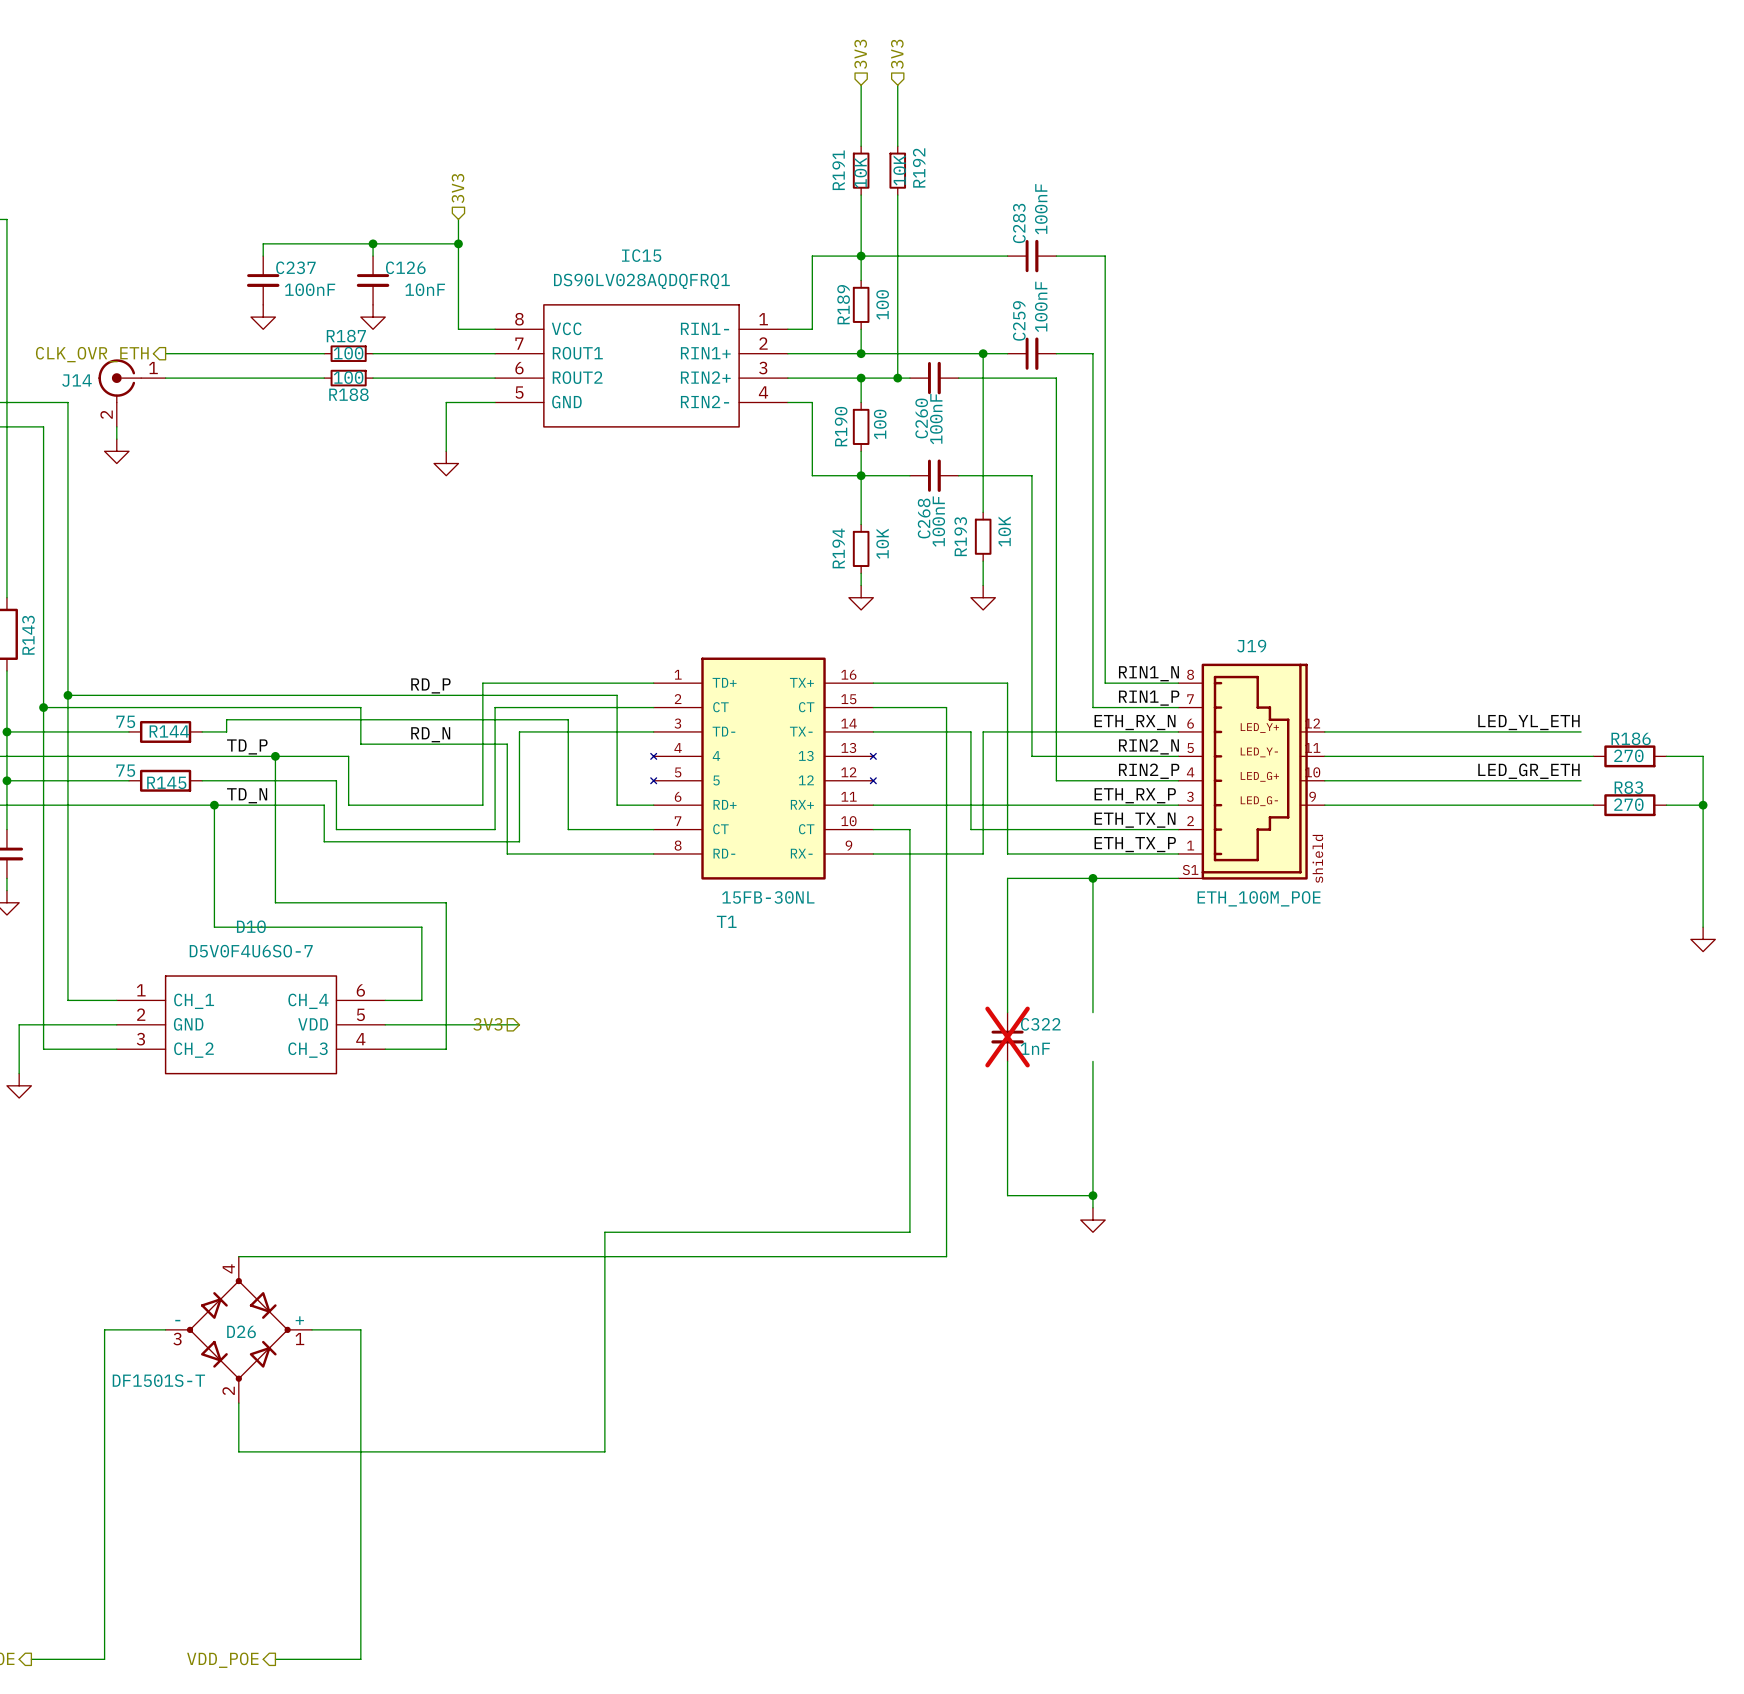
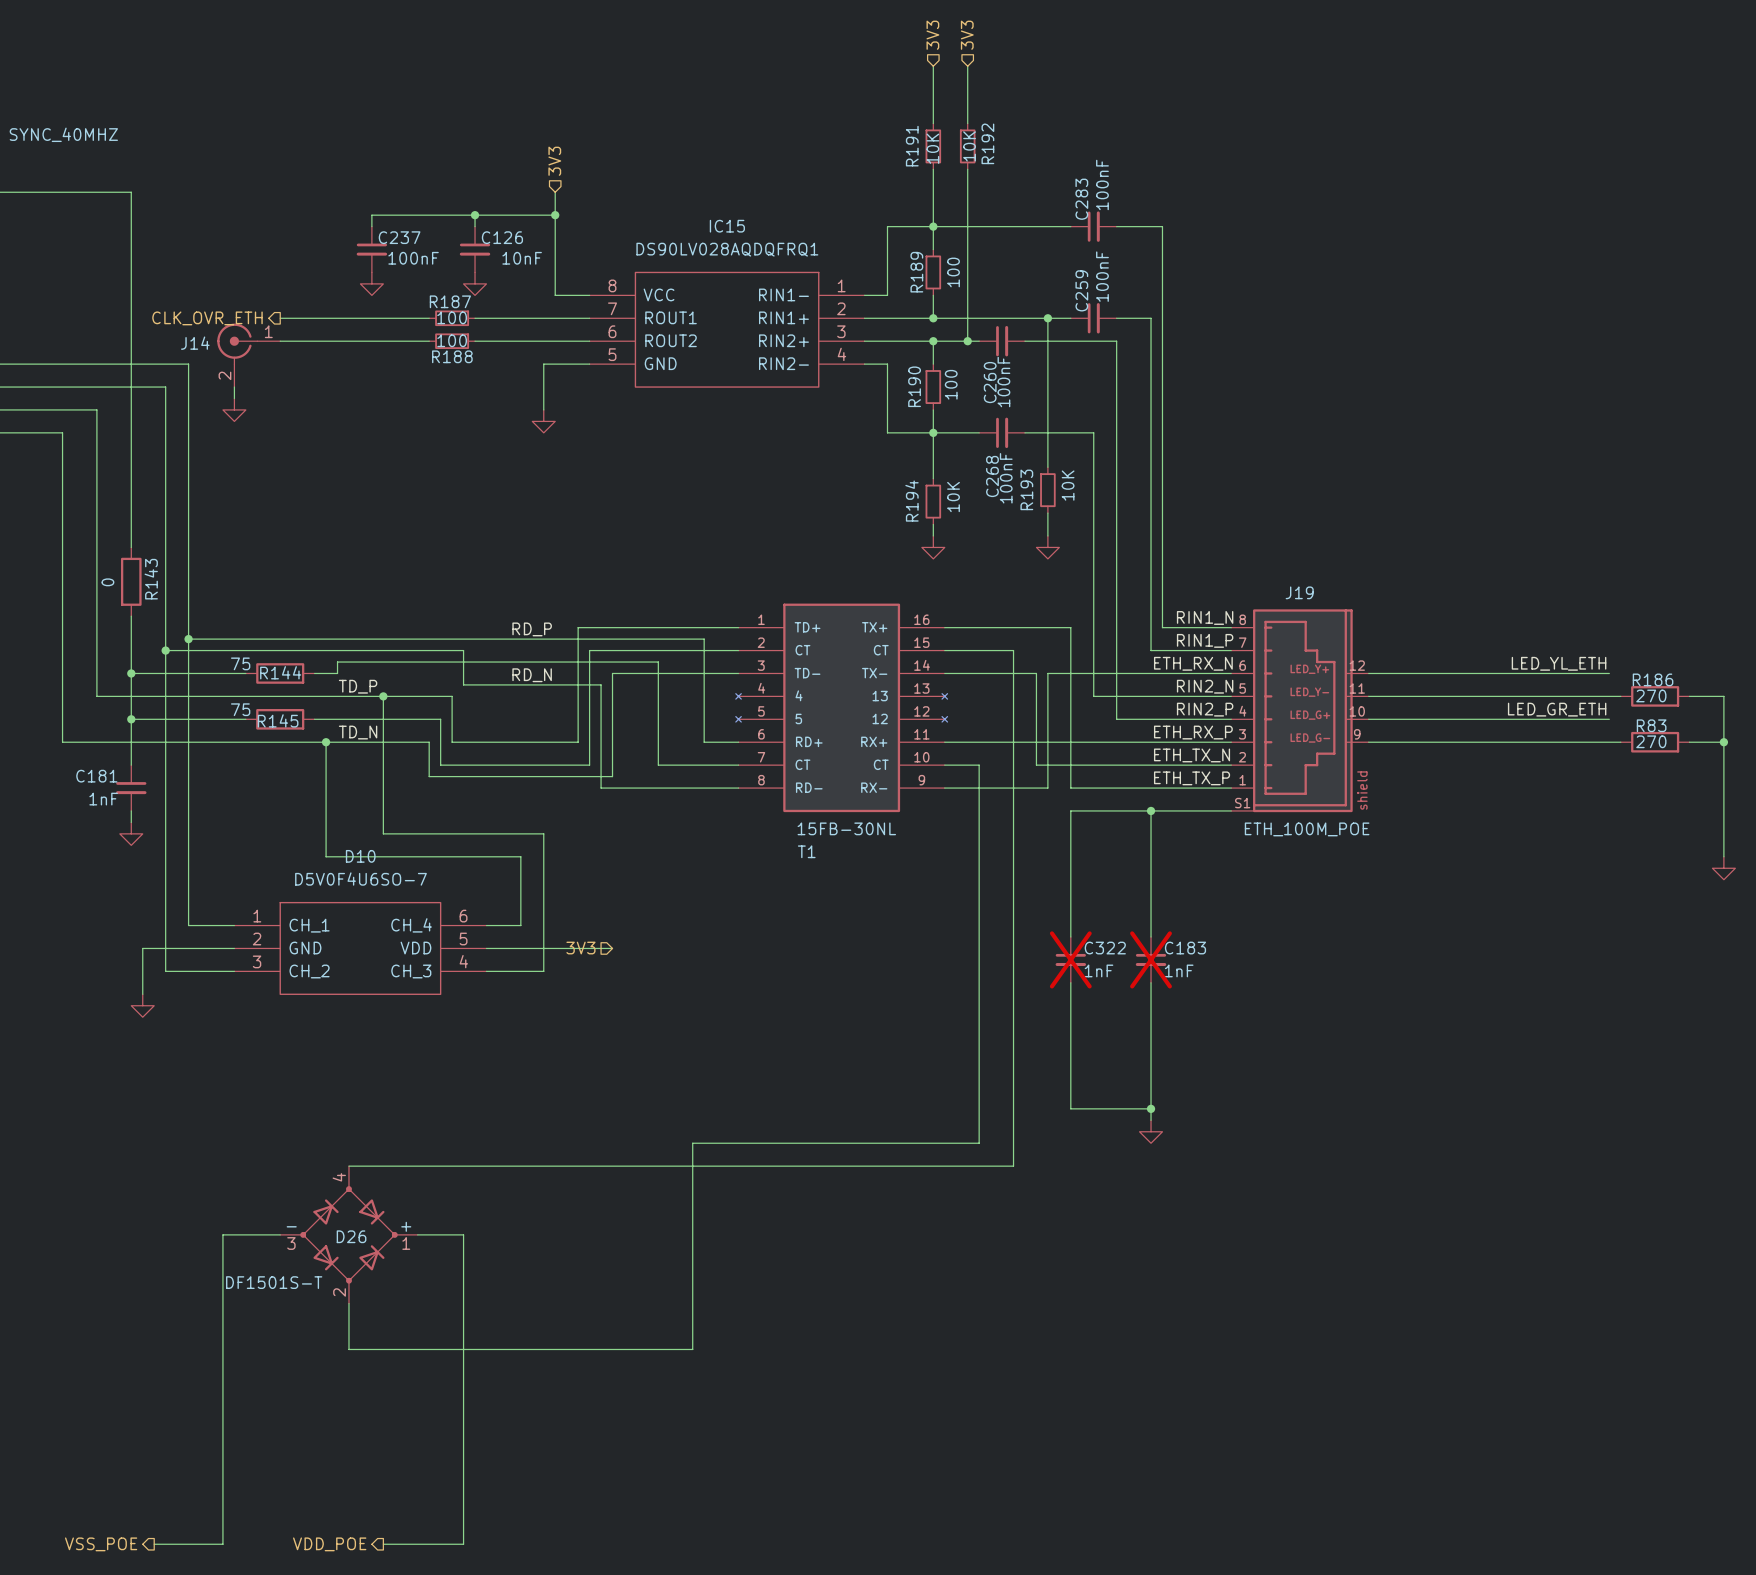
C183: none -> 1nF (1151, 959)

